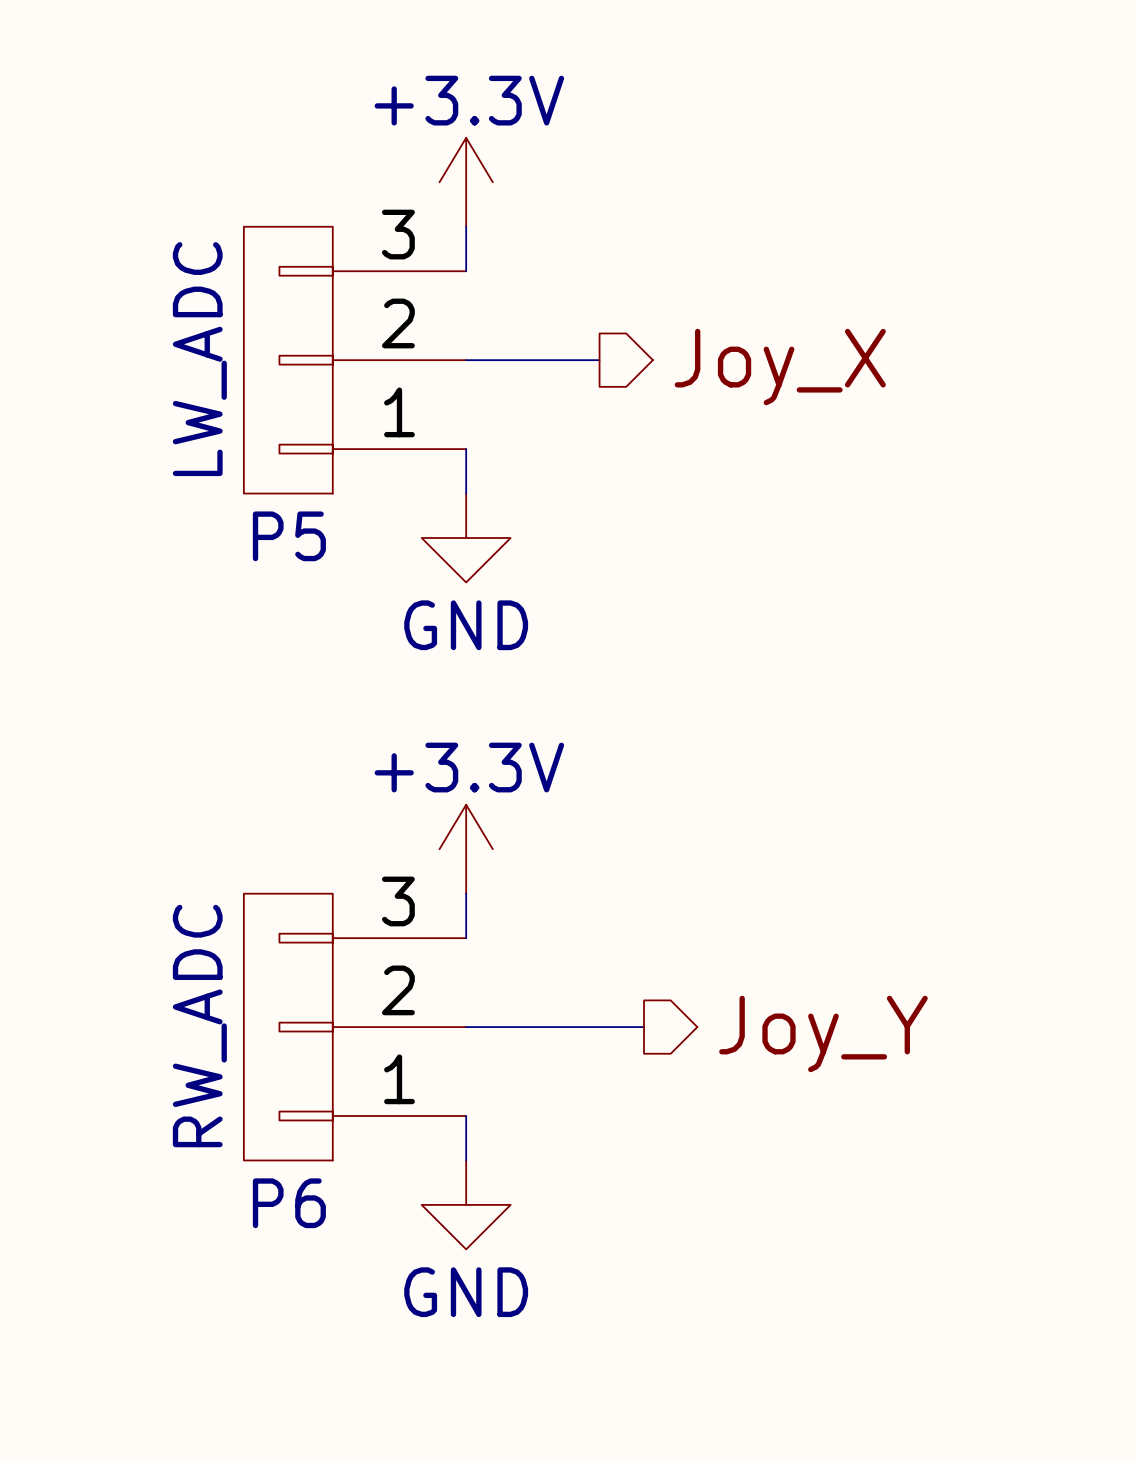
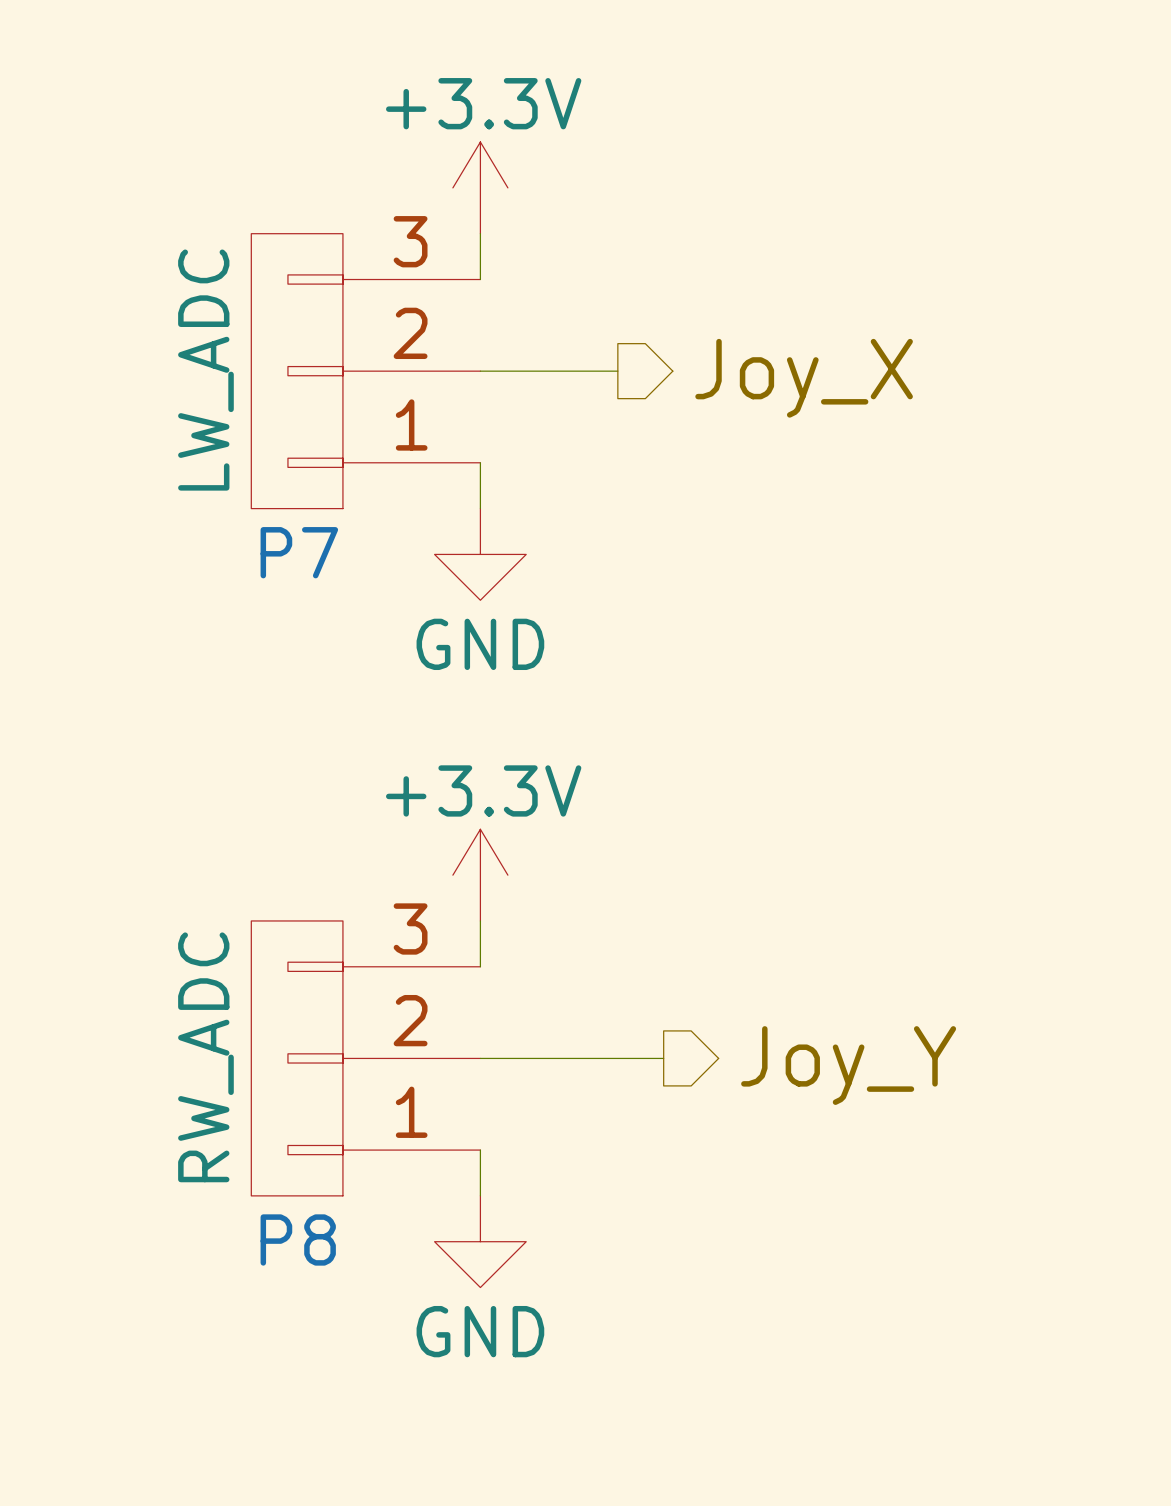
P5 name: P5 (289, 536) -> P7 (299, 552)
P6 name: P6 (289, 1203) -> P8 (298, 1239)

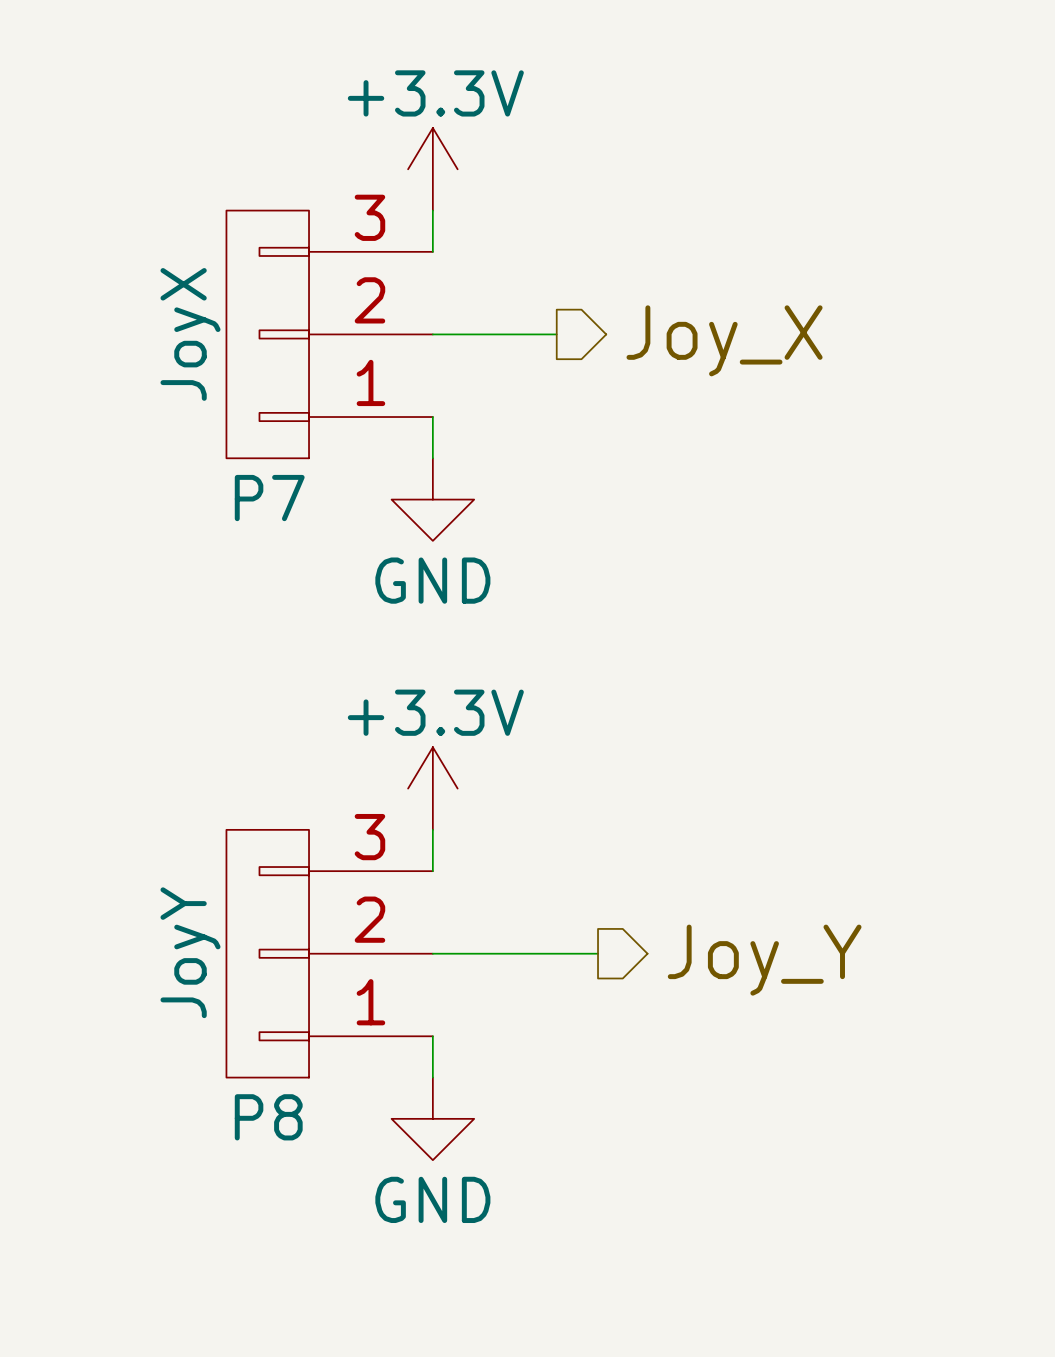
P7 value: LW_ADC (205, 370) -> JoyX (190, 334)
P8 value: RW_ADC (205, 1057) -> JoyY (190, 952)

